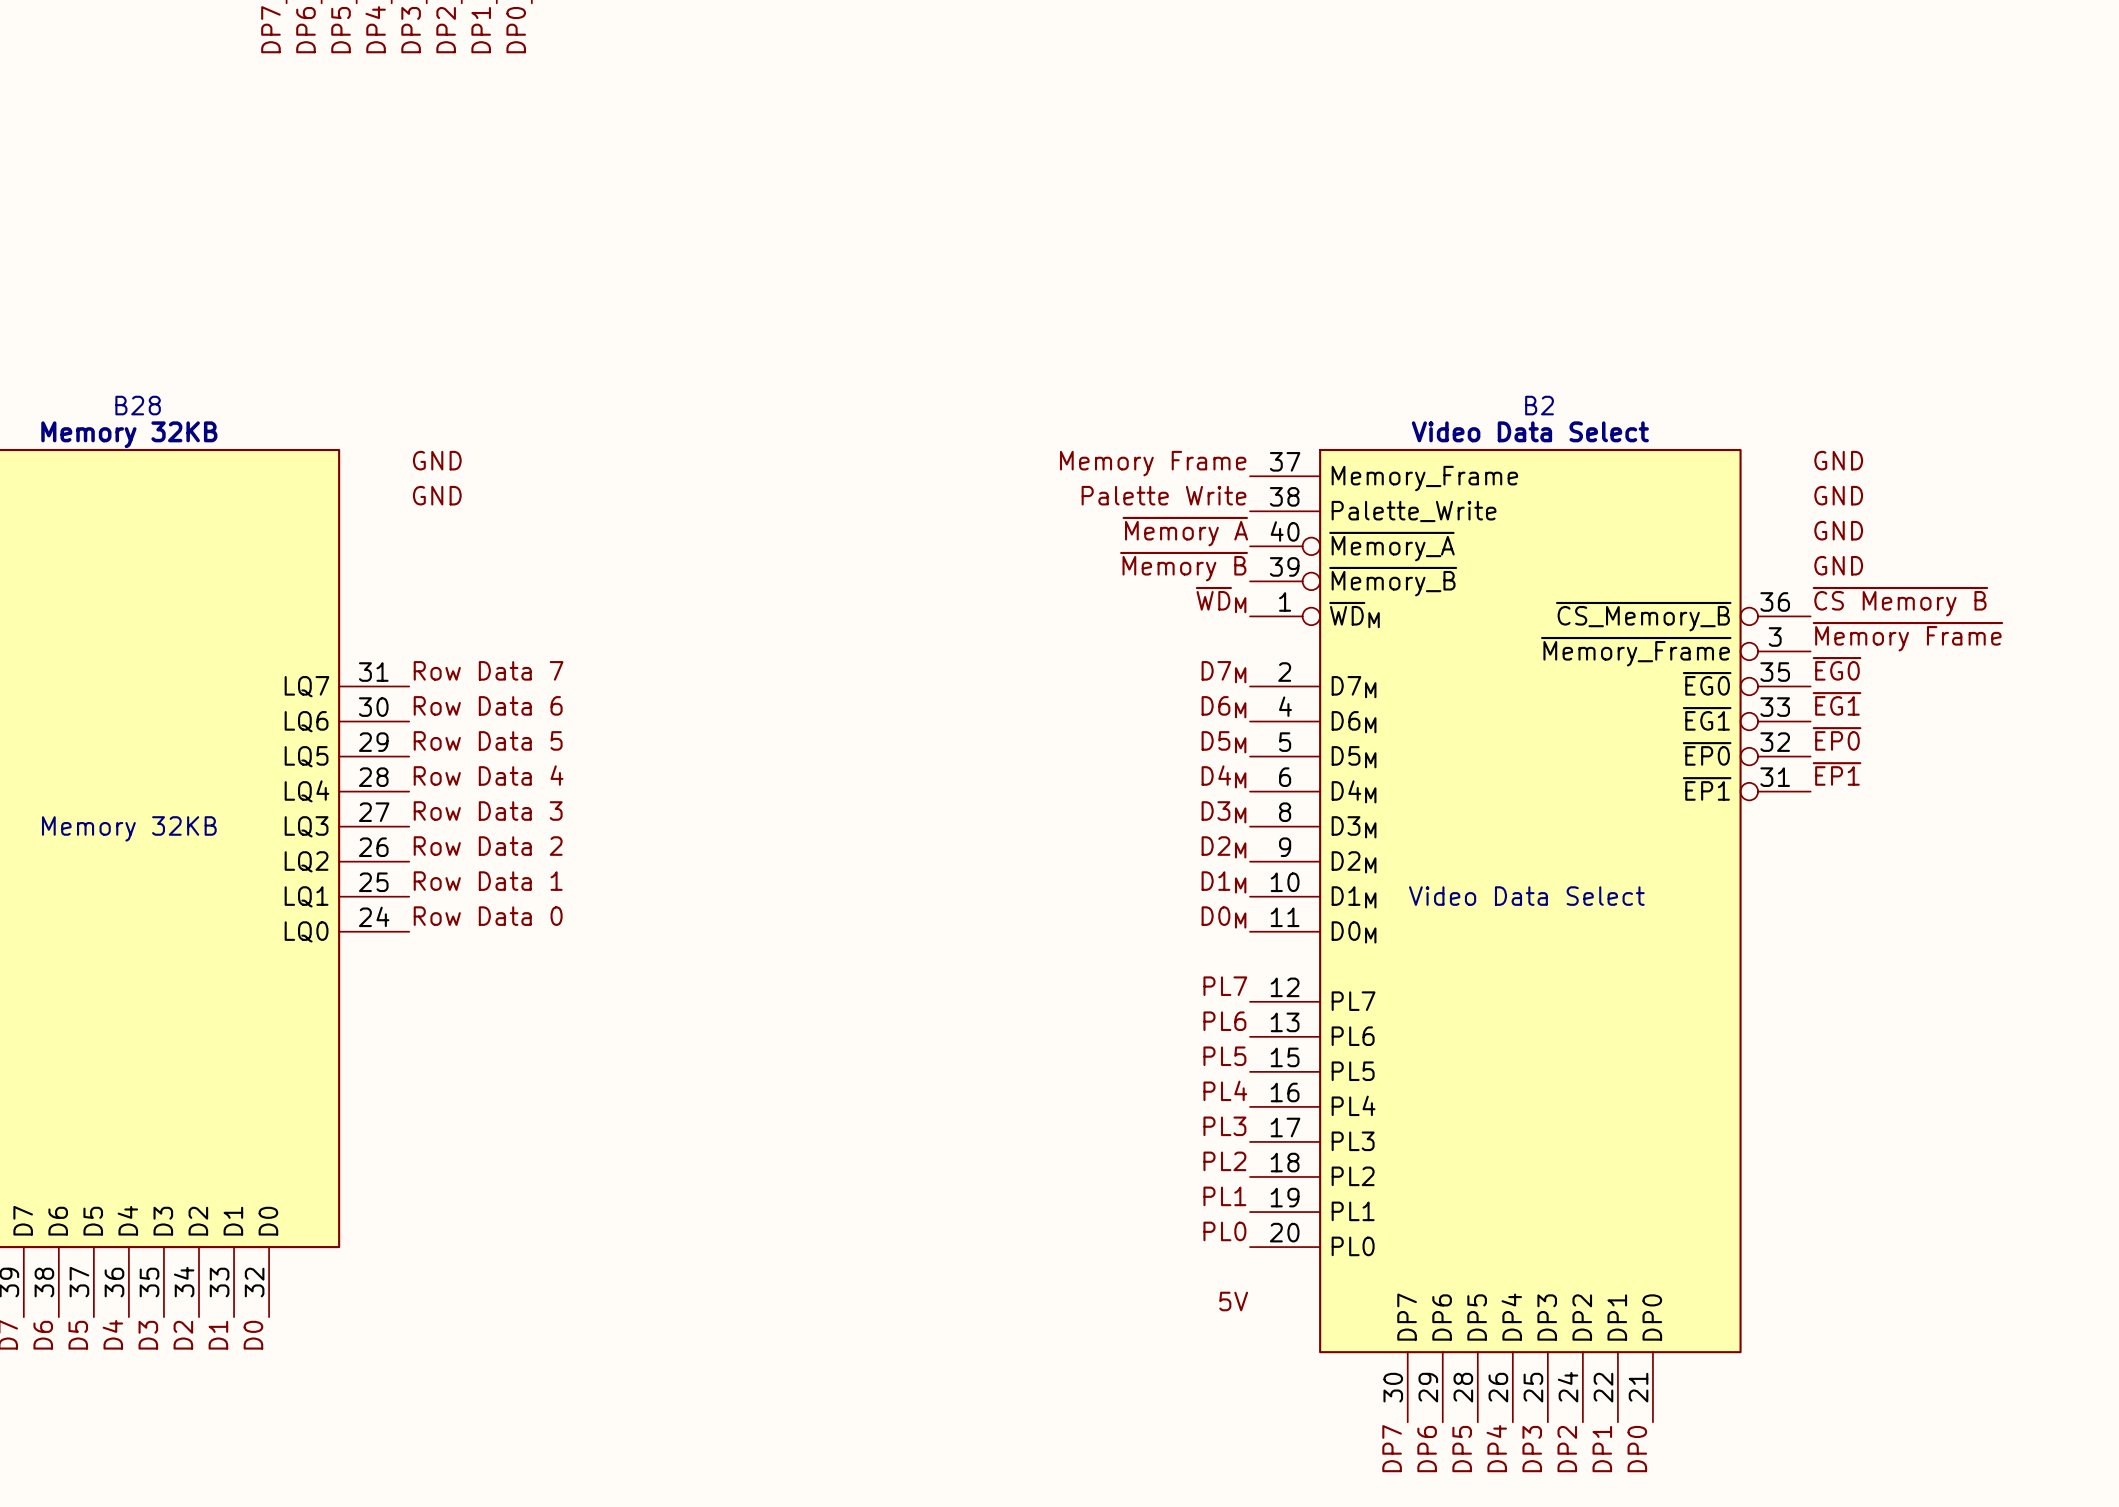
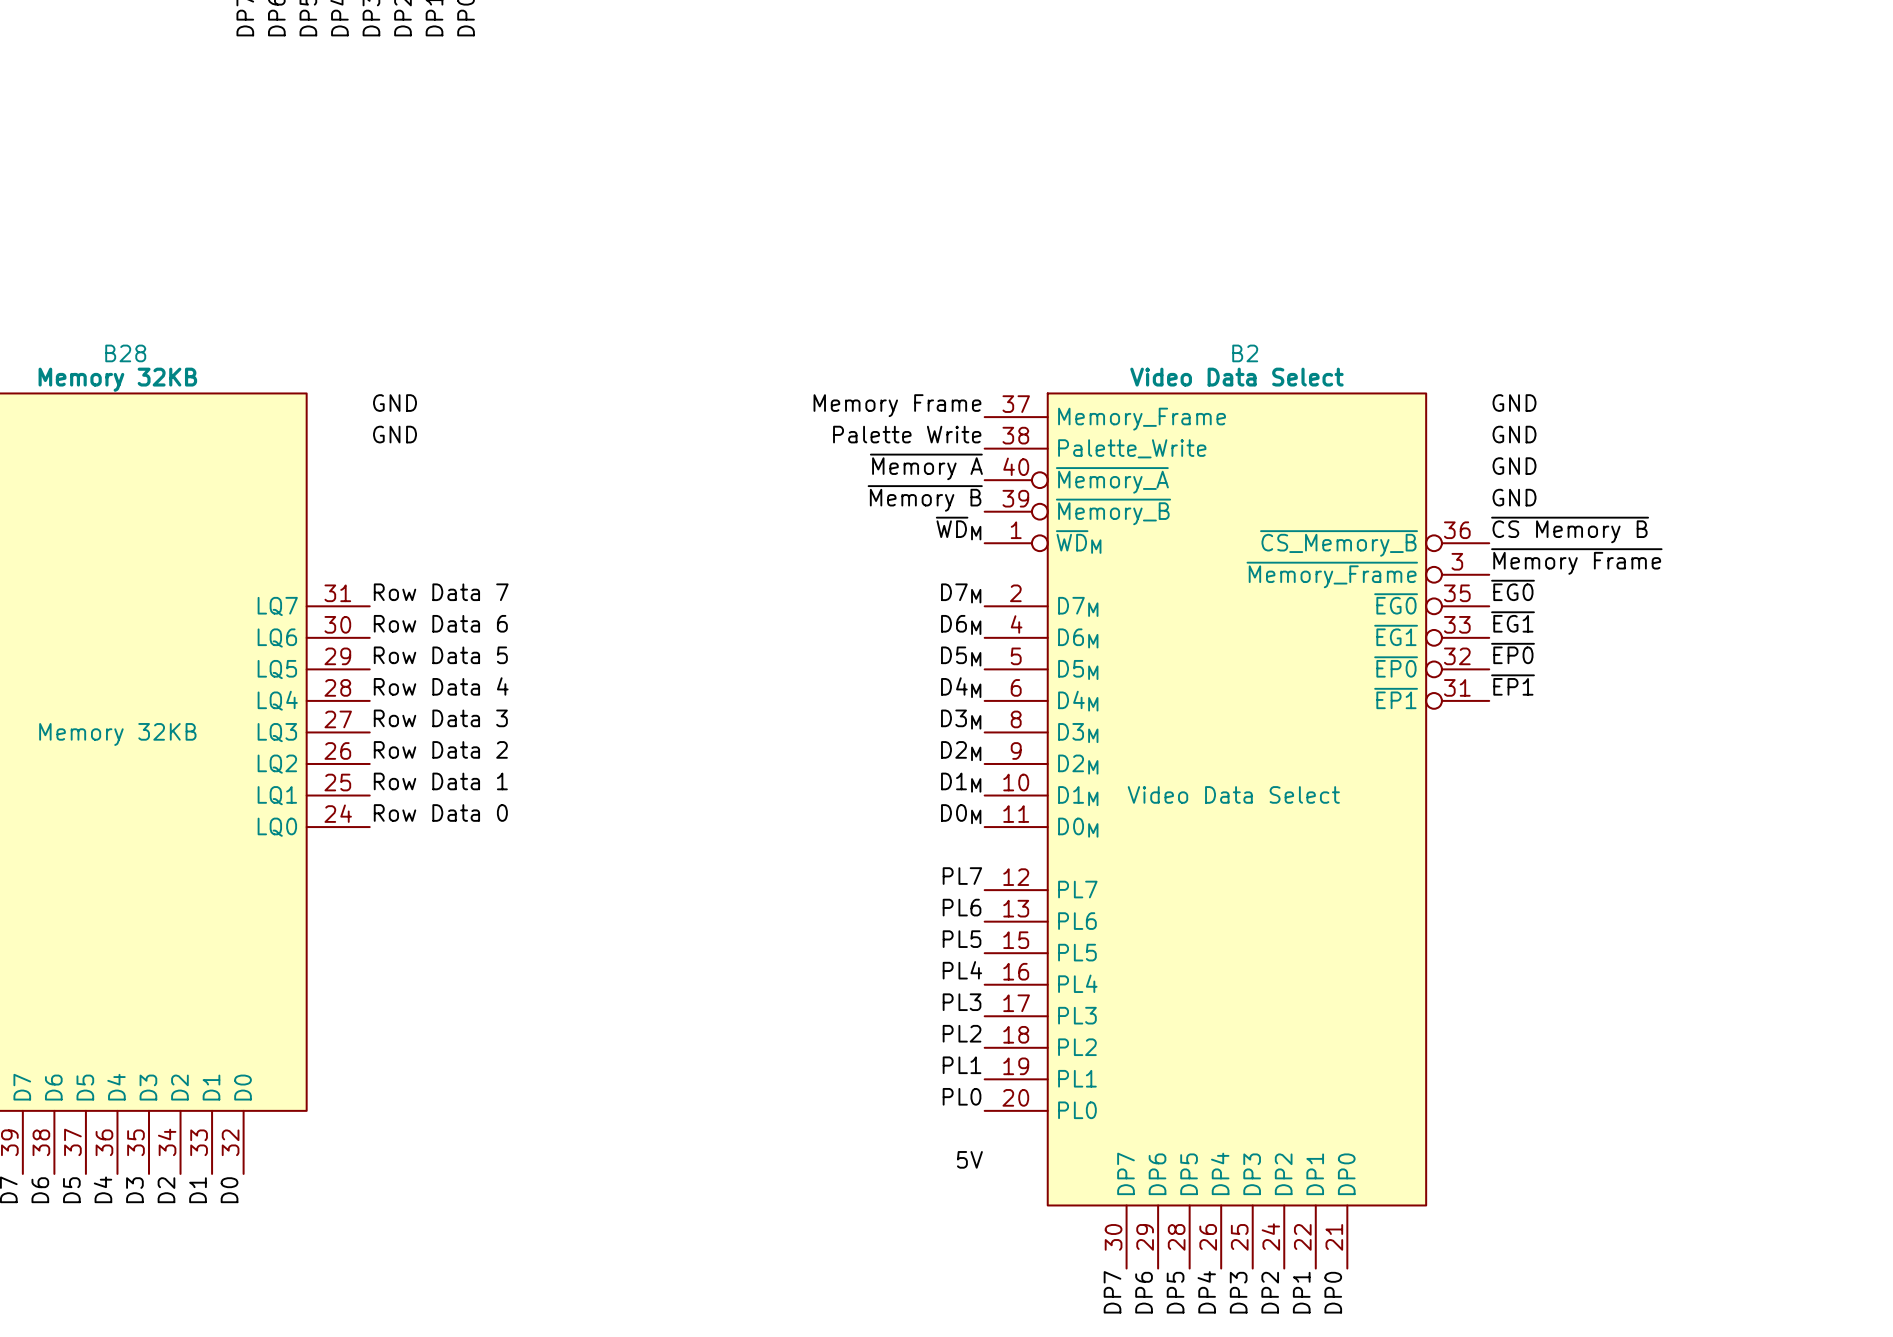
label: none -> GND (1514, 403)
label: GND (1838, 460) -> none
label position: Memory Frame (1153, 463) -> Memory Frame (897, 405)
label position: Palette Write (1164, 495) -> Palette Write (907, 434)
label: none -> GND (1514, 434)
label: GND (1838, 495) -> none
label: none -> GND (1514, 466)
label: GND (1838, 530) -> none
label position: ~{Memory A} (1185, 531) -> ~{Memory A} (926, 466)
label: none -> GND (1514, 497)
label: GND (1838, 565) -> none
label position: ~{Memory B} (1184, 566) -> ~{Memory B} (925, 498)
label position: ~{WD}M (1221, 600) -> ~{WD}M (958, 528)
label position: ~{CS Memory B} (1900, 601) -> ~{CS Memory B} (1570, 529)
label position: ~{Memory Frame} (1907, 636) -> ~{Memory Frame} (1576, 561)
label position: ~{EG0} (1837, 668) -> ~{EG0} (1513, 590)
label position: D7M (1223, 672) -> D7M (961, 593)
label position: ~{EG1} (1837, 703) -> ~{EG1} (1513, 621)
label position: D6M (1223, 707) -> D6M (961, 624)
label position: ~{EP0} (1837, 738) -> ~{EP0} (1513, 653)
label position: D5M (1223, 742) -> D5M (961, 656)
label position: ~{EP1} (1837, 773) -> ~{EP1} (1513, 685)
label position: D4M (1223, 776) -> D4M (961, 687)
label position: D3M (1223, 812) -> D3M (961, 719)
label position: D2M (1223, 847) -> D2M (961, 751)
label position: D1M (1223, 882) -> D1M (961, 782)
label position: D0M (1223, 917) -> D0M (961, 814)
B2 position: (1530, 935) -> (1236, 830)
label position: PL7 (1225, 986) -> PL7 (962, 876)
label position: PL6 (1224, 1021) -> PL6 (962, 907)
label position: PL5 (1224, 1056) -> PL5 (962, 939)
label position: PL4 (1225, 1090) -> PL4 (962, 970)
label position: PL3 (1224, 1126) -> PL3 (962, 1002)
label position: PL2 (1224, 1161) -> PL2 (962, 1033)
label position: PL1 (1224, 1196) -> PL1 (962, 1065)
label position: PL0 (1224, 1231) -> PL0 (962, 1096)
label position: 5V (1233, 1301) -> 5V (969, 1159)
label position: DP7 (1392, 1448) -> DP7 (1112, 1292)
label position: DP4 (1496, 1448) -> DP4 (1206, 1292)
label position: DP6 (1427, 1449) -> DP6 (1144, 1292)
label position: DP5 (1462, 1449) -> DP5 (1175, 1292)
label position: DP3 (1532, 1449) -> DP3 (1238, 1292)
label position: DP2 (1567, 1449) -> DP2 (1270, 1292)
label position: DP1 (1602, 1449) -> DP1 (1301, 1292)
label position: DP0 (1637, 1449) -> DP0 (1333, 1292)

